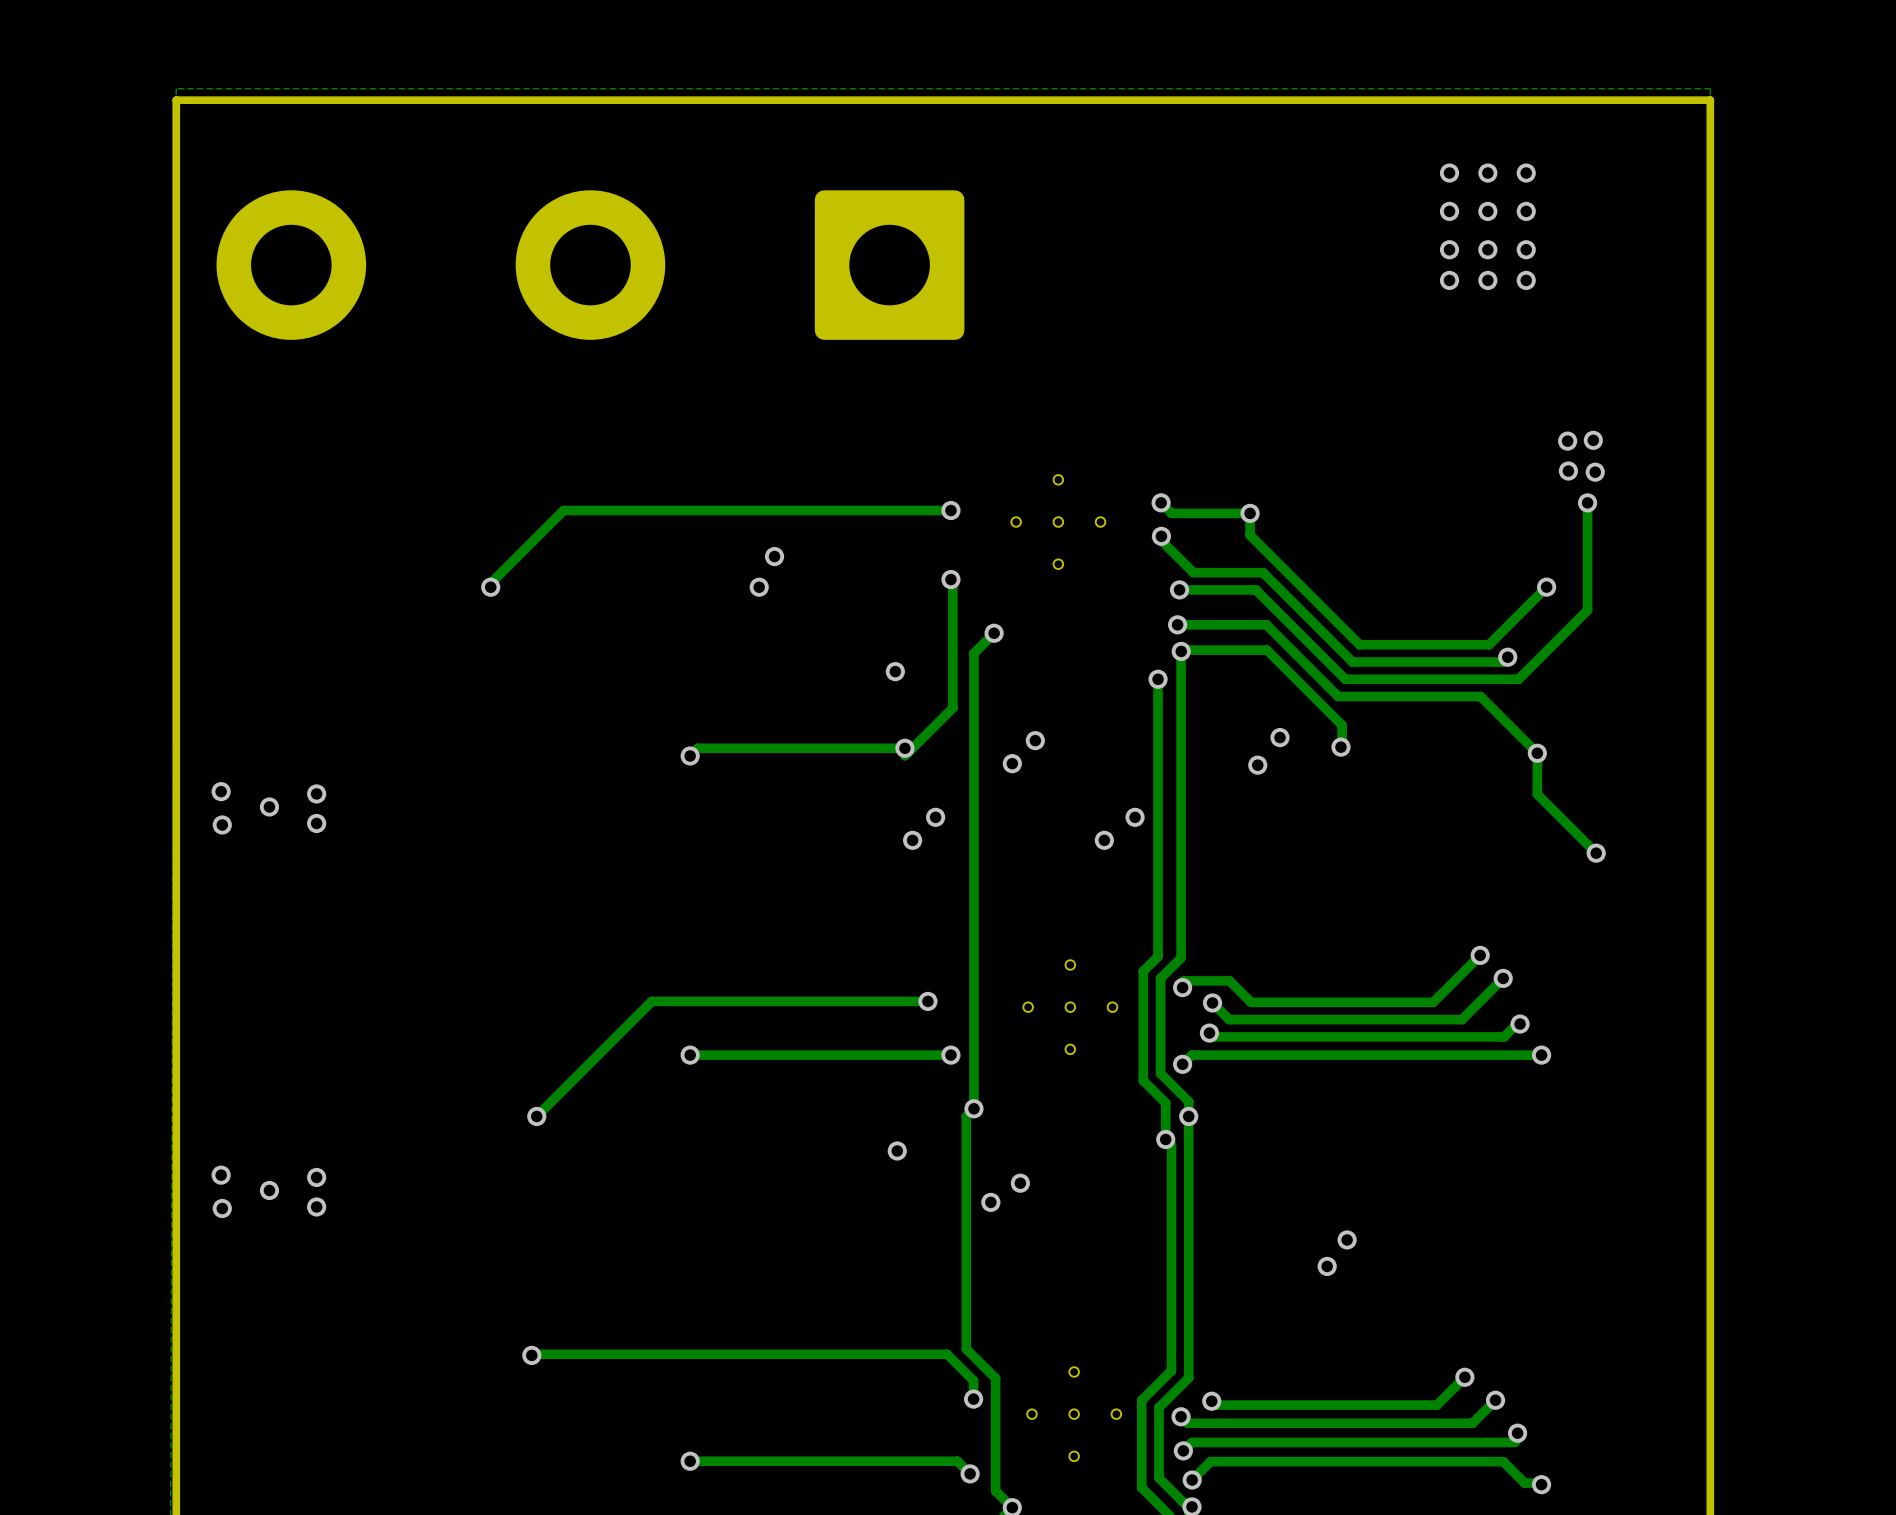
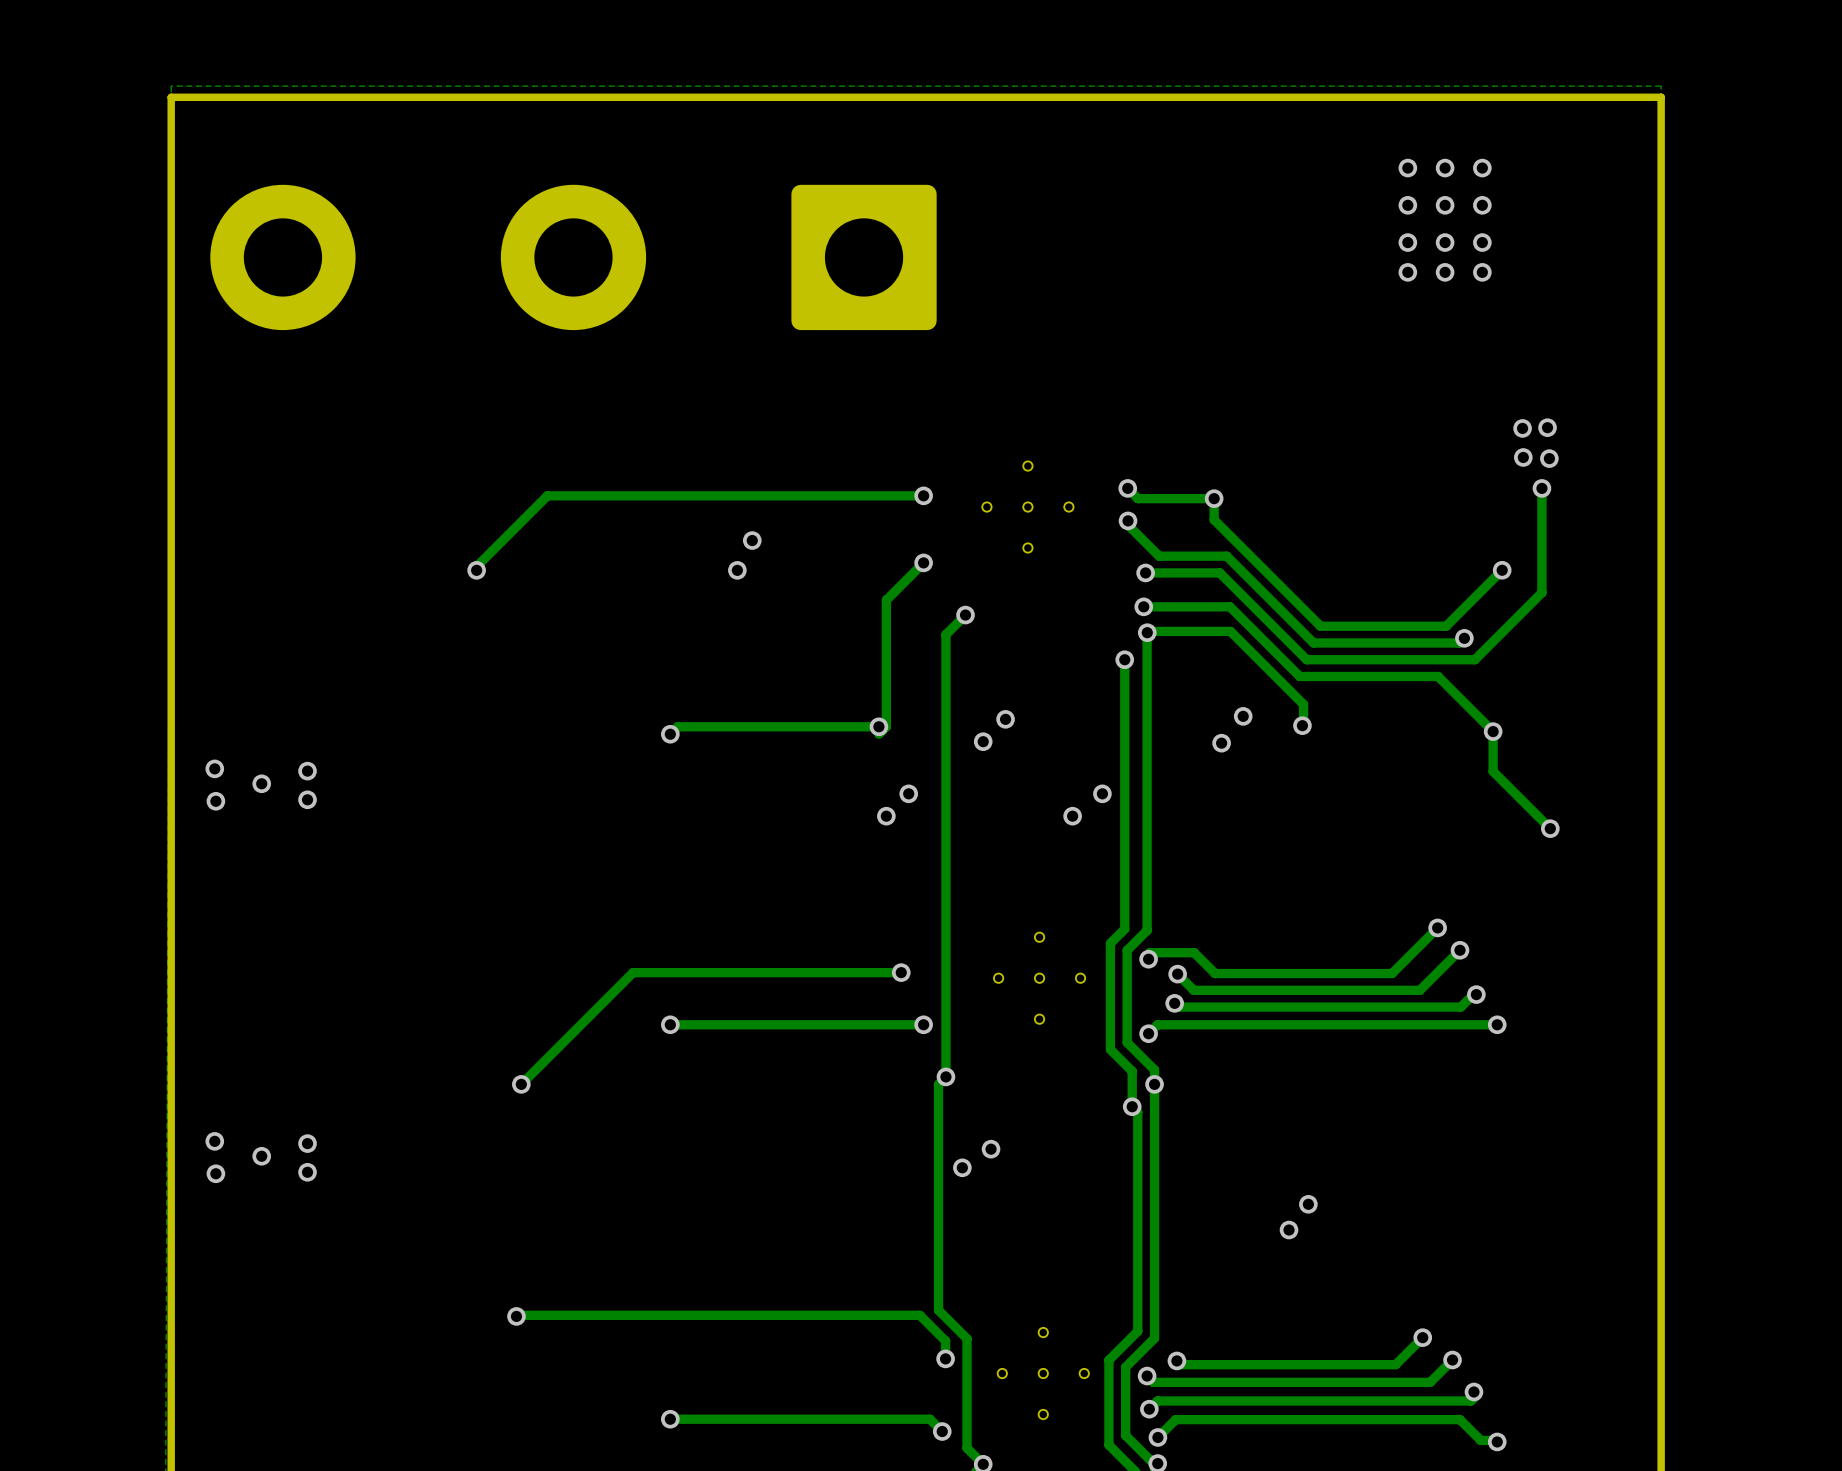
track: (950, 579) (952, 581) (952, 708) (912, 748) -> (923, 562) (886, 600) (886, 726)
via: (895, 671) -> none
via: (897, 1150) -> none

